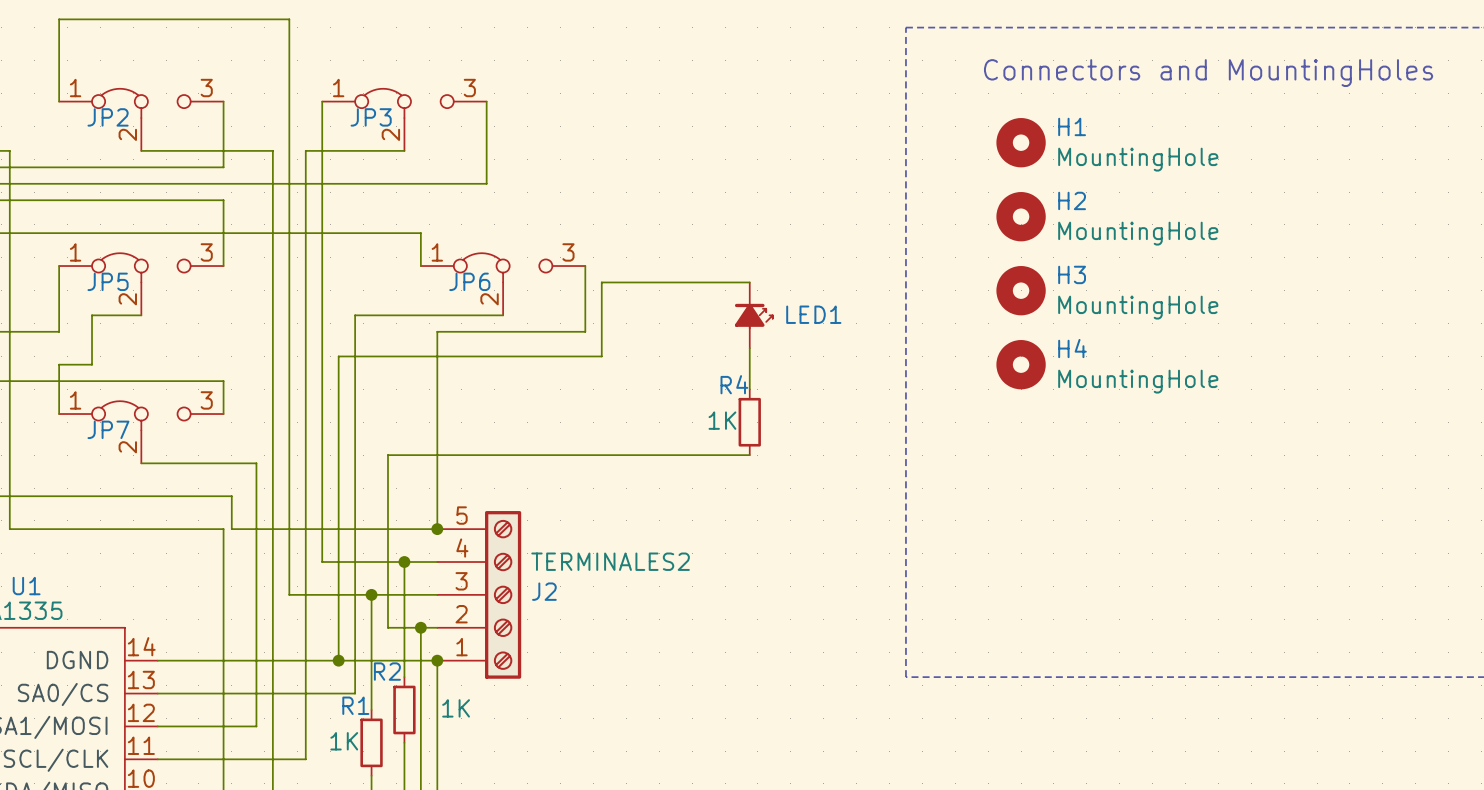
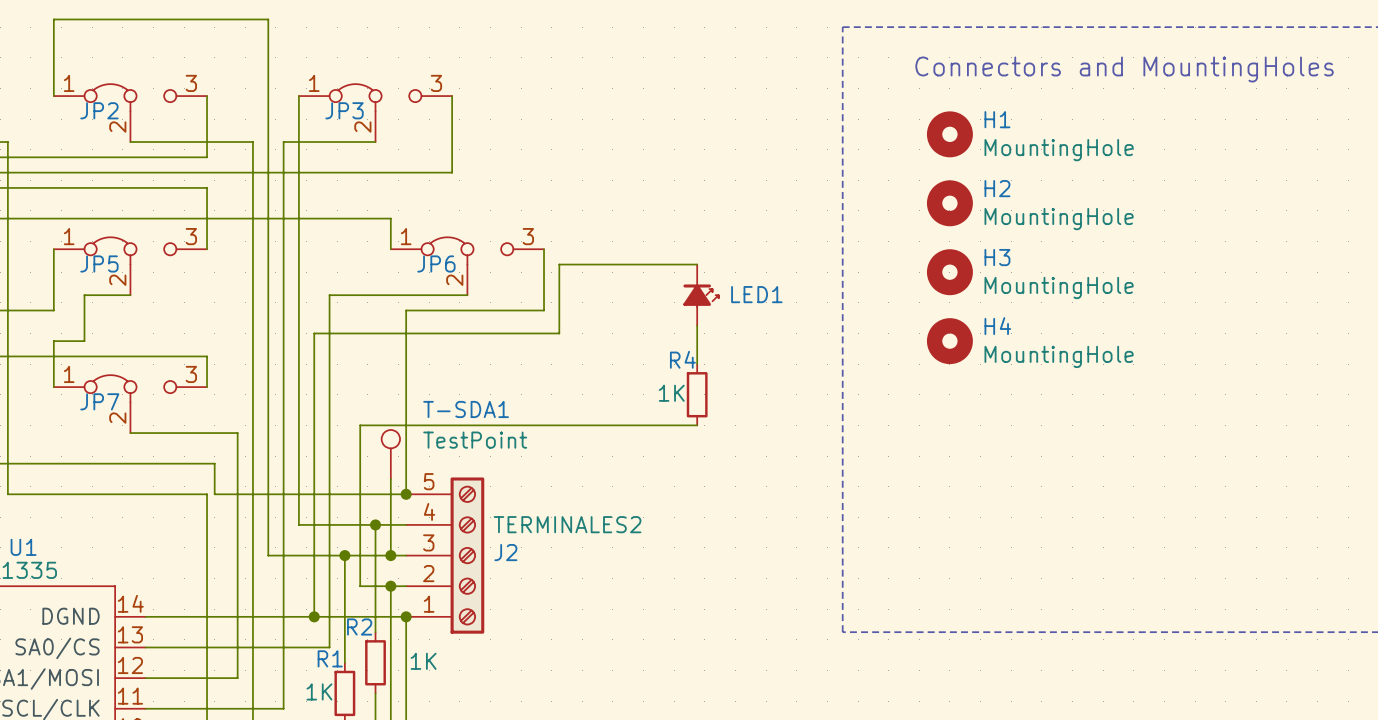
T-SDA1: none -> TestPoint (390, 454)
wire: none -> (390, 478) (390, 555)
junction: none -> (390, 555)

